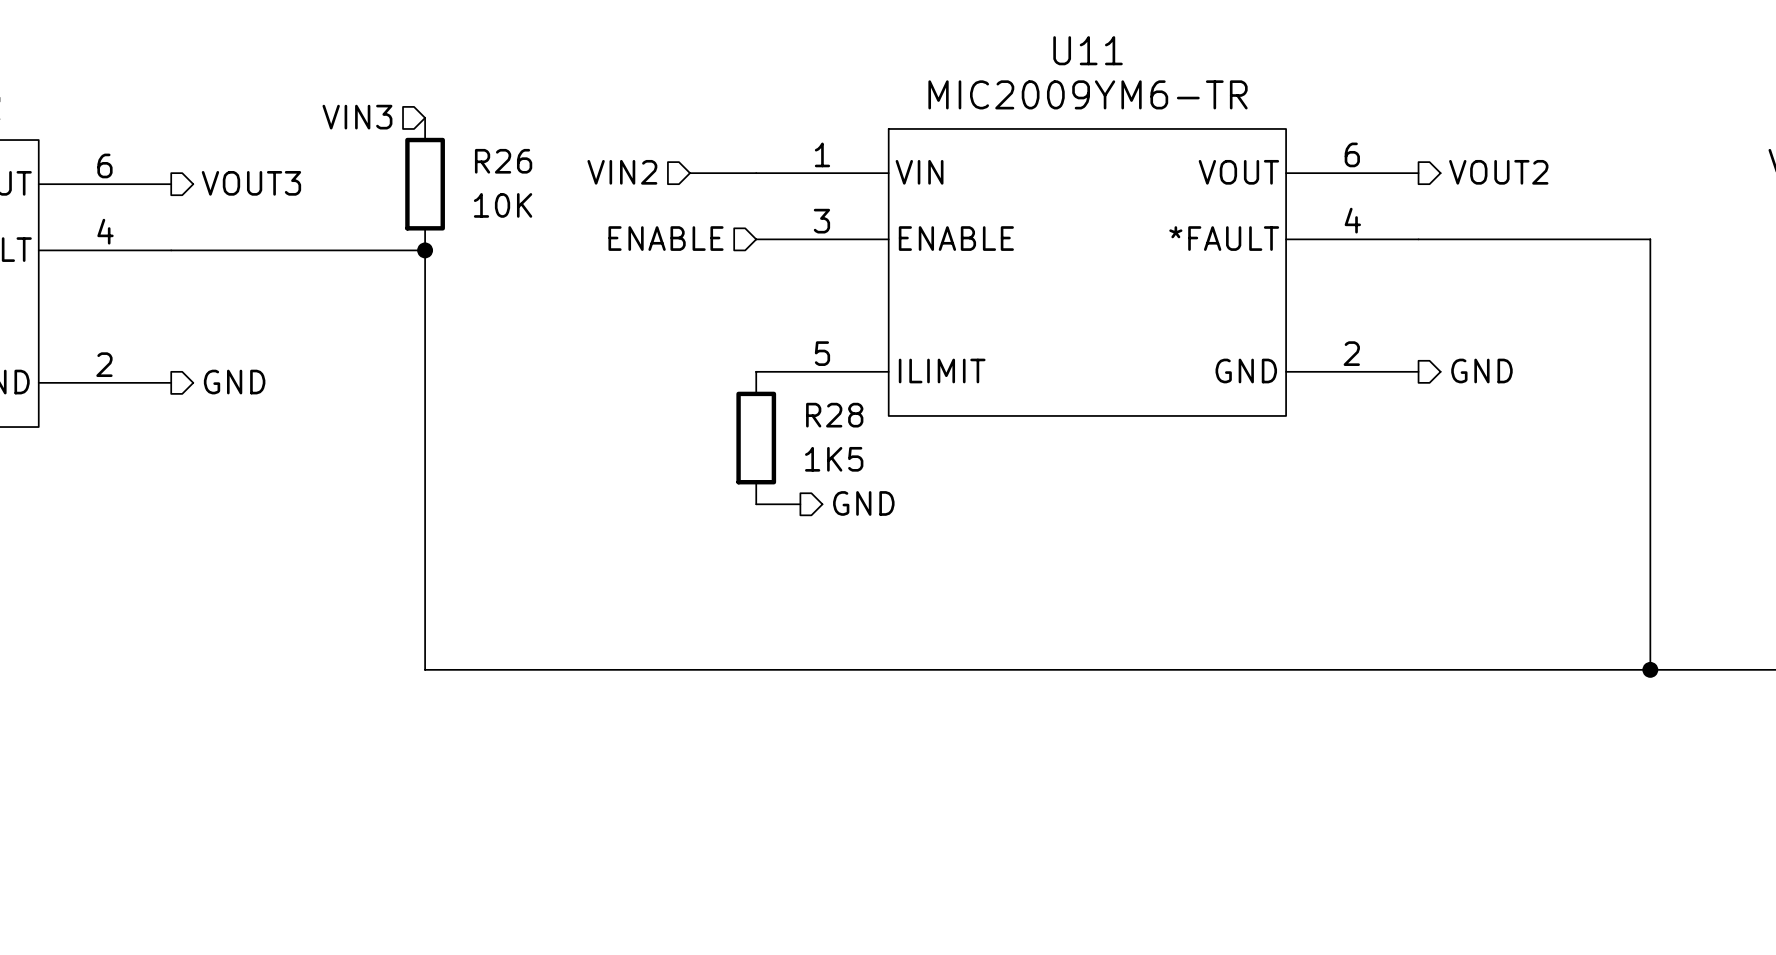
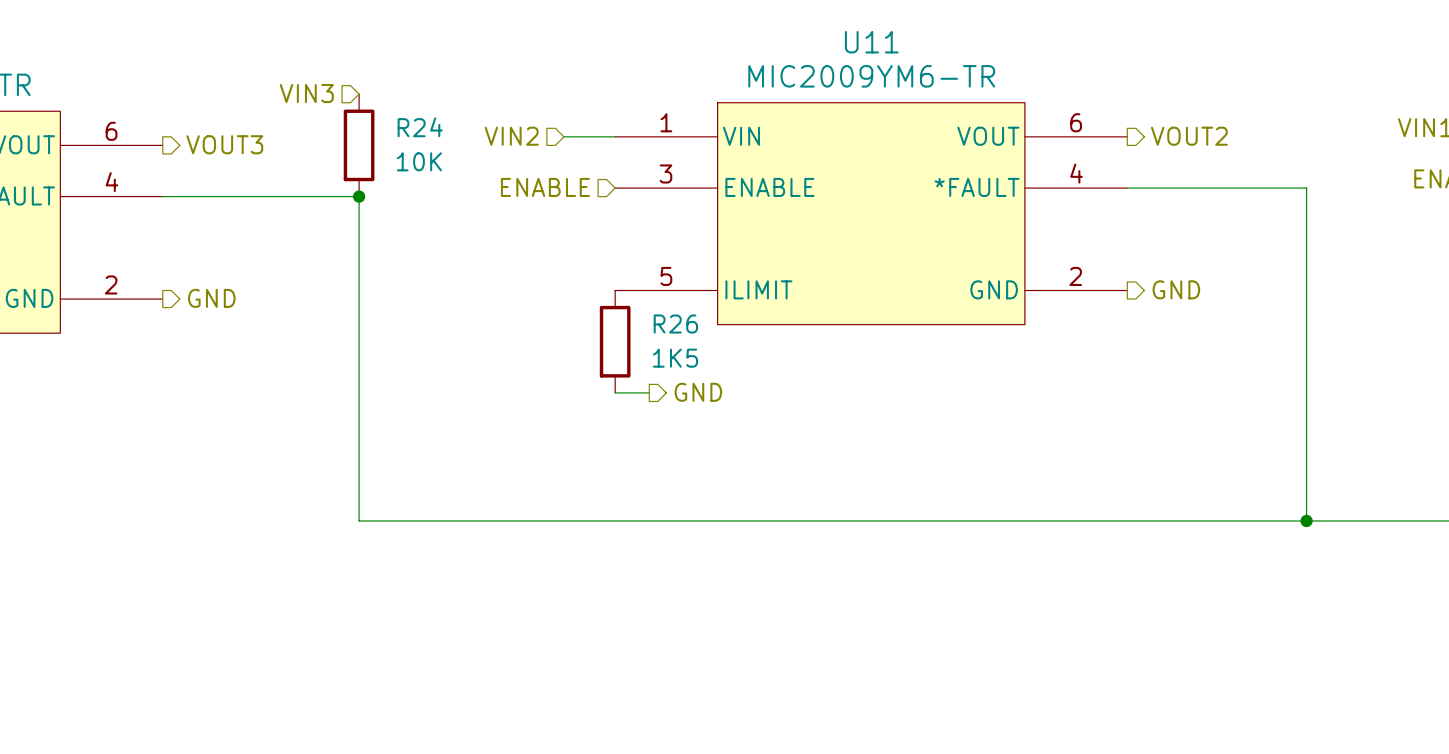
R26 name: R26 (503, 161) -> R24 (420, 127)
R28 name: R28 (834, 415) -> R26 (675, 324)

